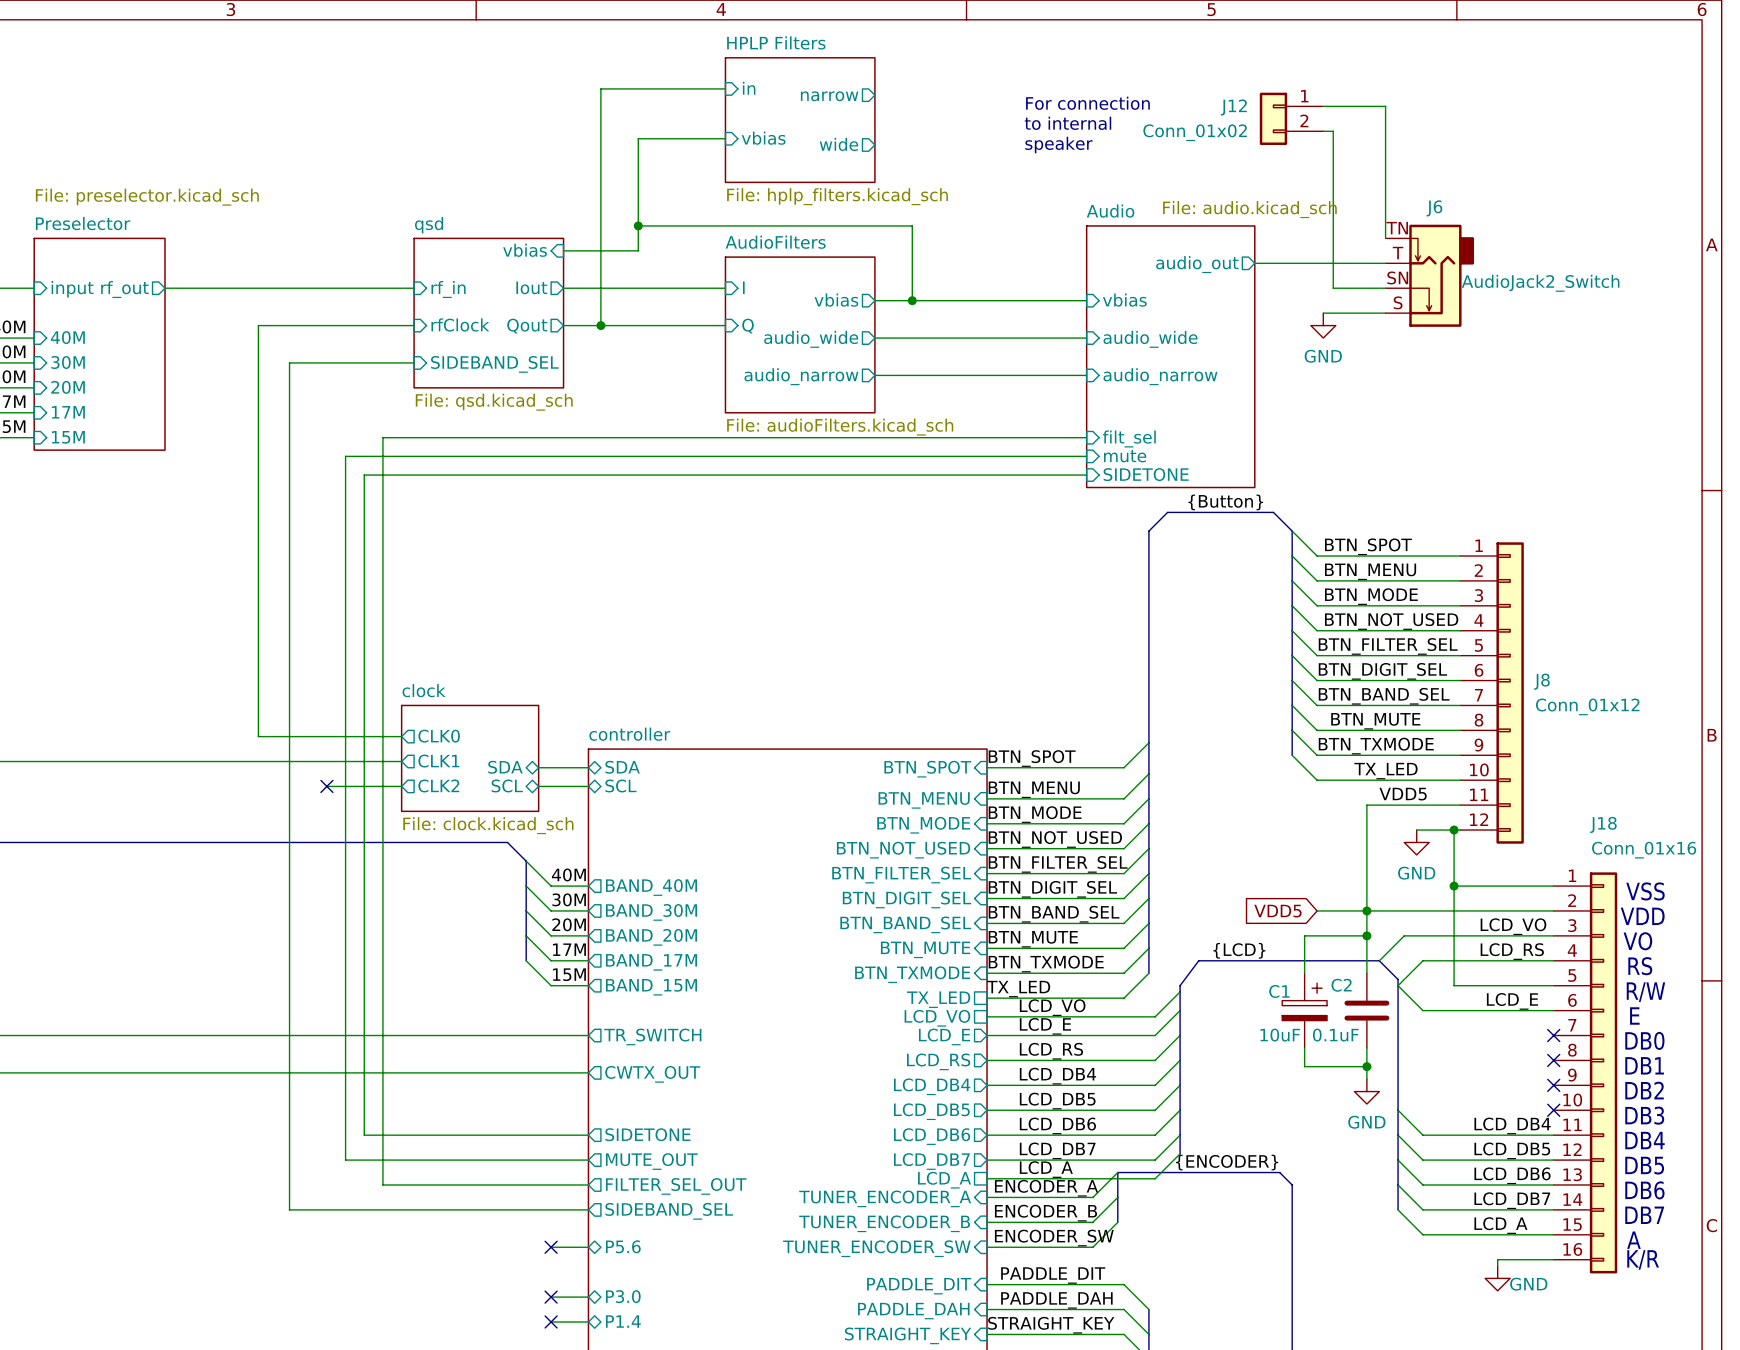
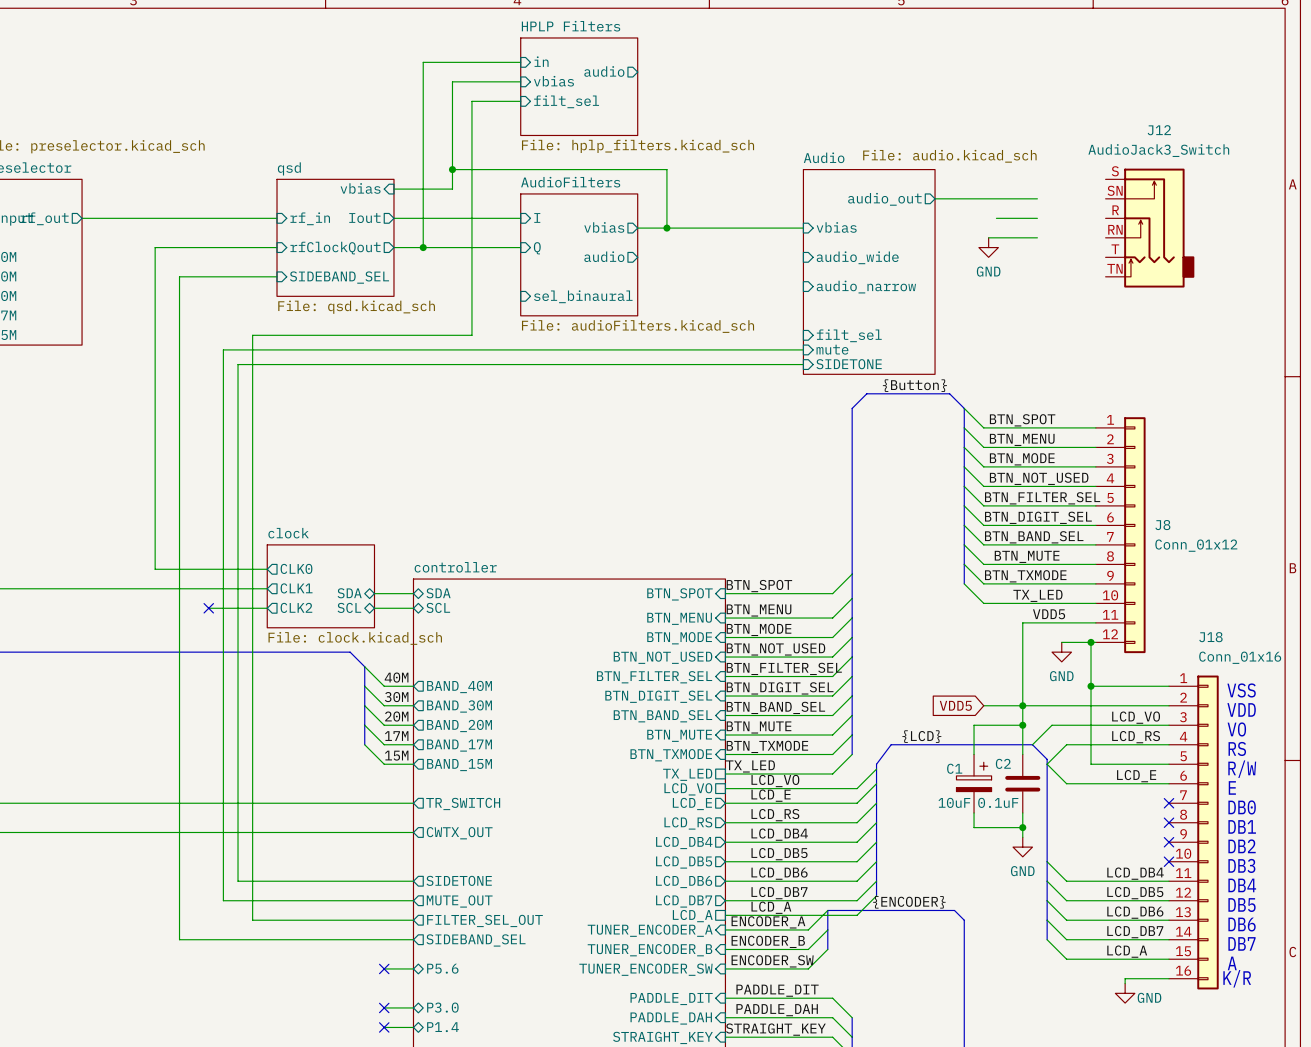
J12 symbol: [1259, 92, 1324, 145] -> [1105, 168, 1195, 288]
sheet pin: narrow (829, 96) -> audio (604, 71)
text: For connection (1087, 103) -> none
wire: (1323, 106) (1385, 106) (1385, 238) -> none
J12 name position: J12 (1233, 107) -> J12 (1159, 130)
sheet pin: none -> vbias (553, 81)
text: to internal (1068, 123) -> none
wire: (1323, 131) (1333, 131) (1333, 288) -> none
J12 value: Conn_01x02 (1195, 132) -> AudioJack3_Switch (1158, 150)
wire: (638, 138) (663, 138) -> (452, 101) (452, 81) (520, 81)
sheet pin: vbias (763, 138) -> filt_sel (566, 101)
sheet pin: wide (838, 144) -> none
text: speaker (1058, 145) -> none
J6: AudioJack2_Switch (1429, 275) -> none
wire: (874, 338) (1086, 338) -> none
sheet pin: audio_wide (811, 339) -> audio (604, 256)
wire: (874, 375) (1086, 375) -> none
sheet pin: audio_narrow (801, 376) -> none
sheet pin: none -> sel_binaural (583, 296)
wire: (663, 437) (1086, 437) -> (471, 335) (471, 101)

